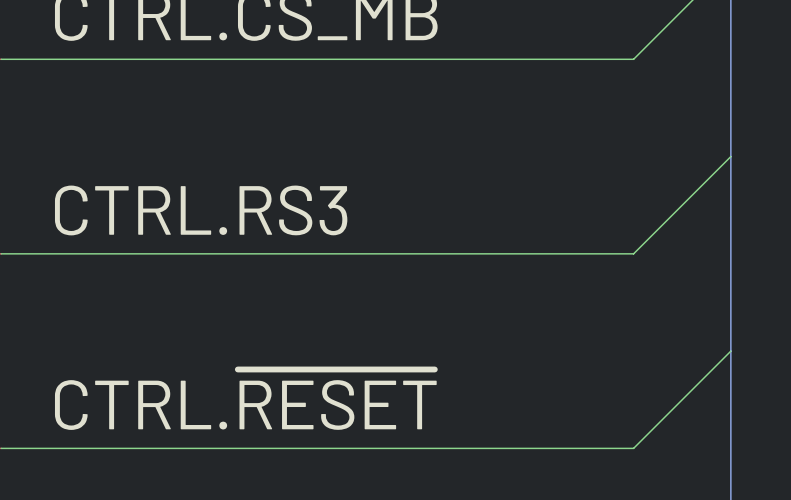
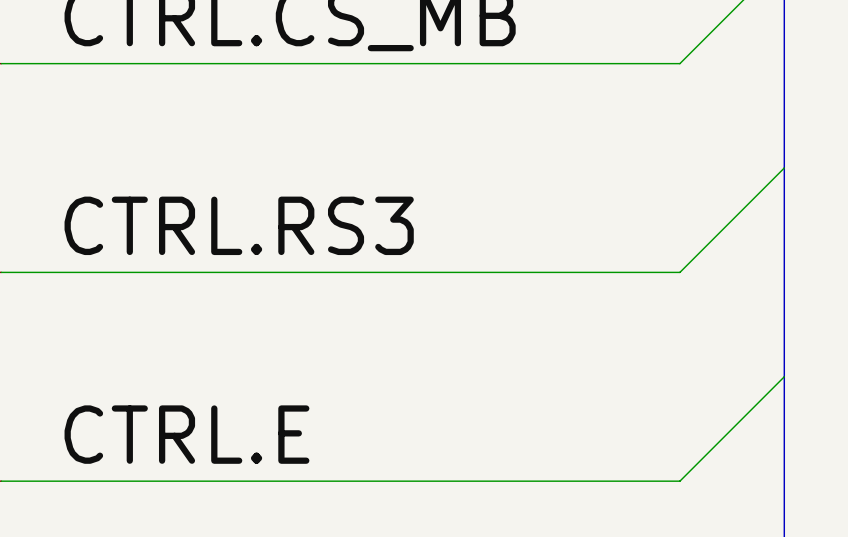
label: CTRL.~{RESET} (245, 399) -> CTRL.E (186, 434)

